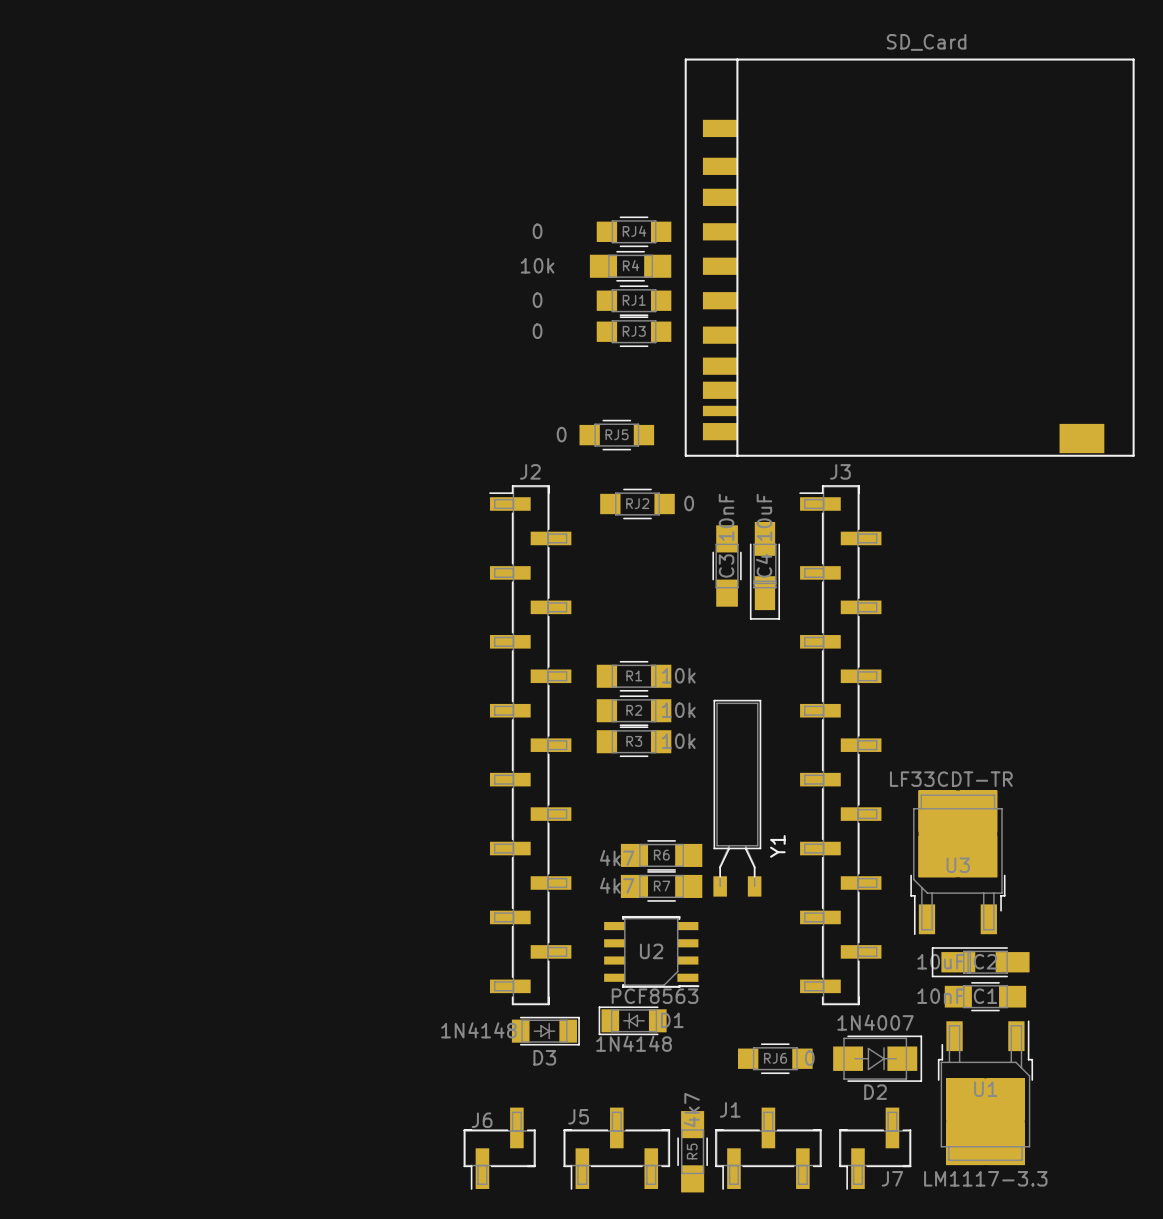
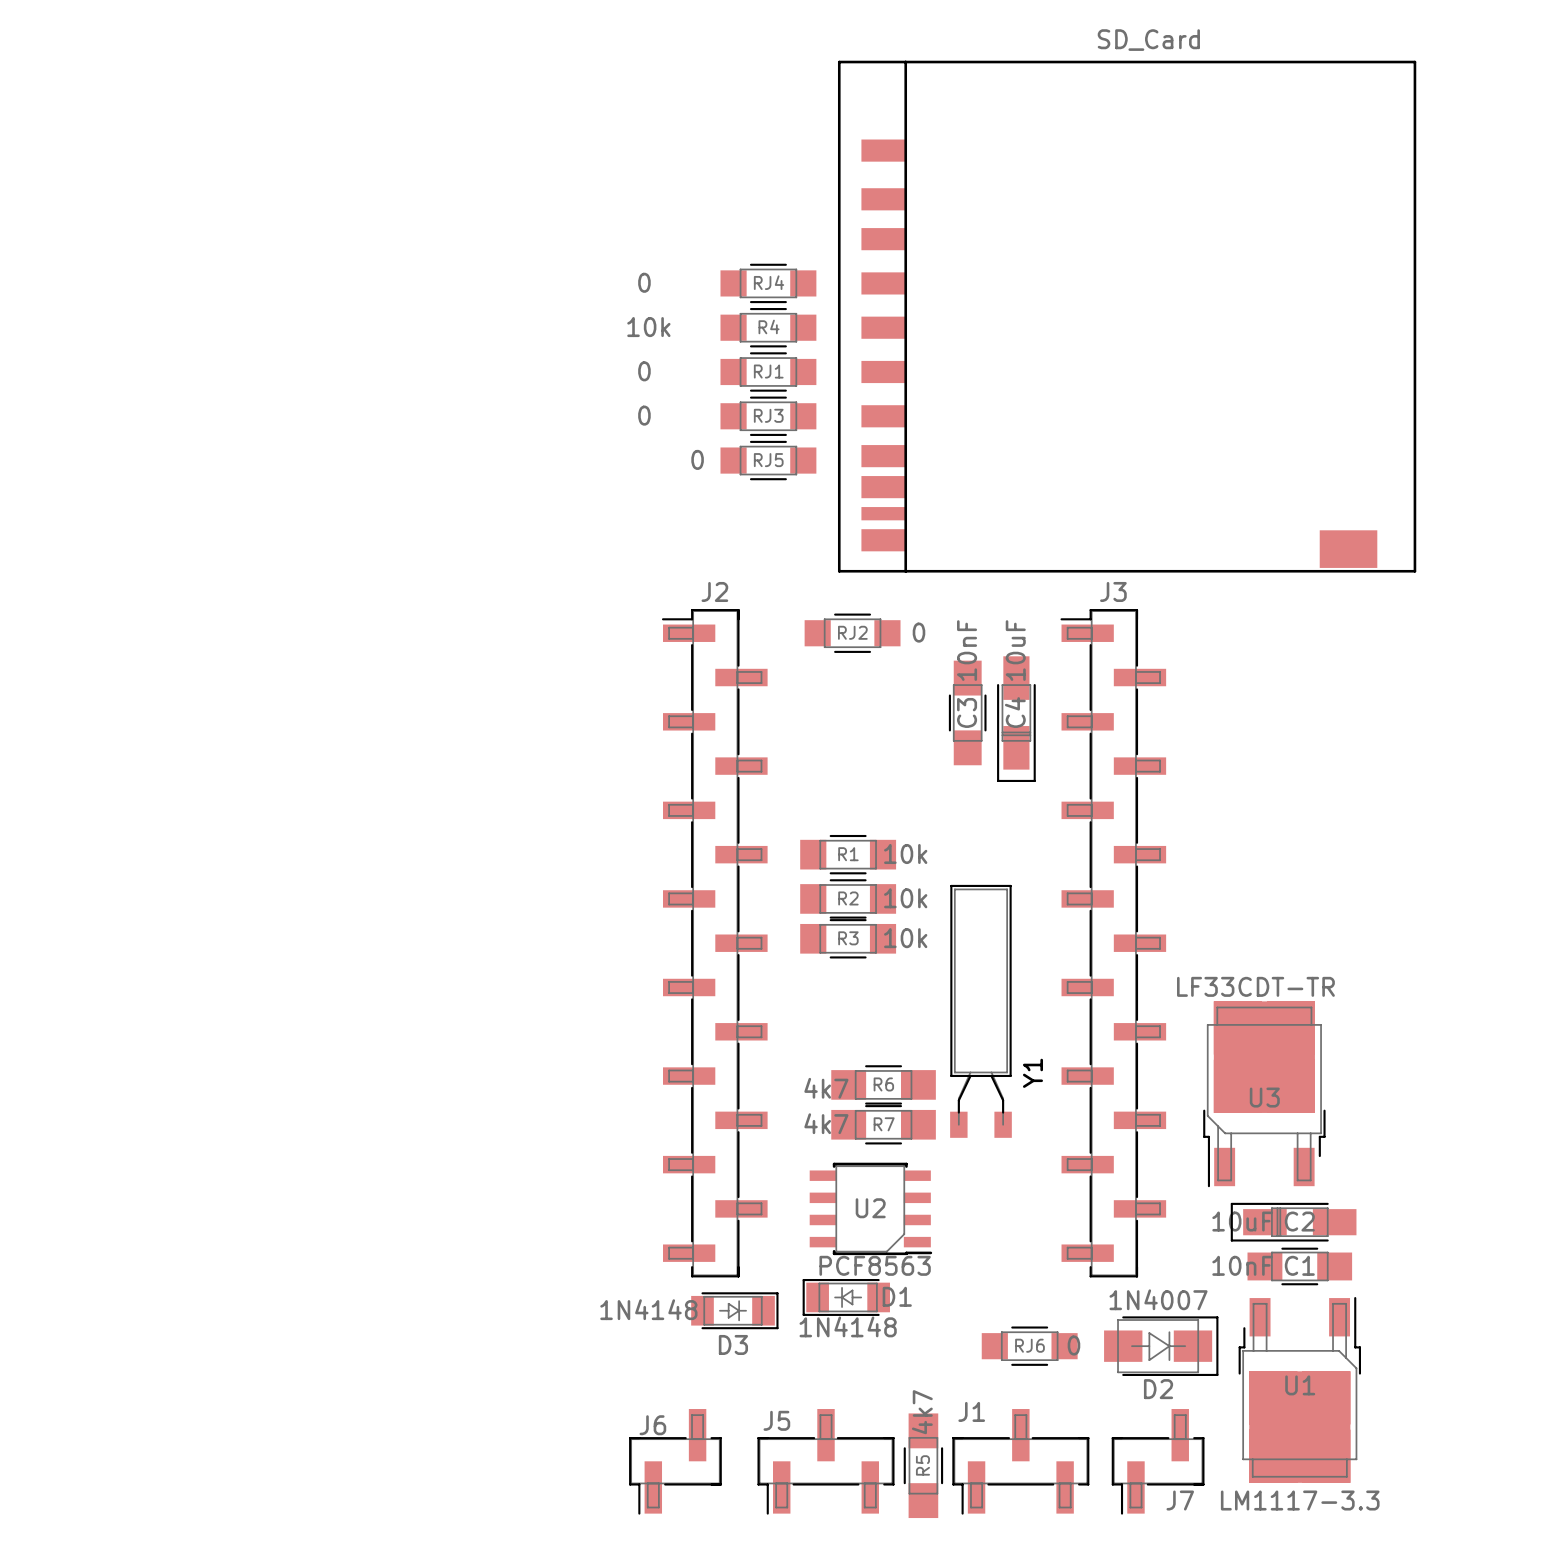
RJ4 position: (634, 231) -> (768, 283)
R4 footprint: [589, 250, 672, 282] -> [720, 308, 817, 348]
part position: (909, 257) -> (1127, 316)
RJ1 position: (634, 300) -> (768, 371)
RJ3 position: (634, 331) -> (768, 416)
RJ5 position: (616, 435) -> (768, 460)

